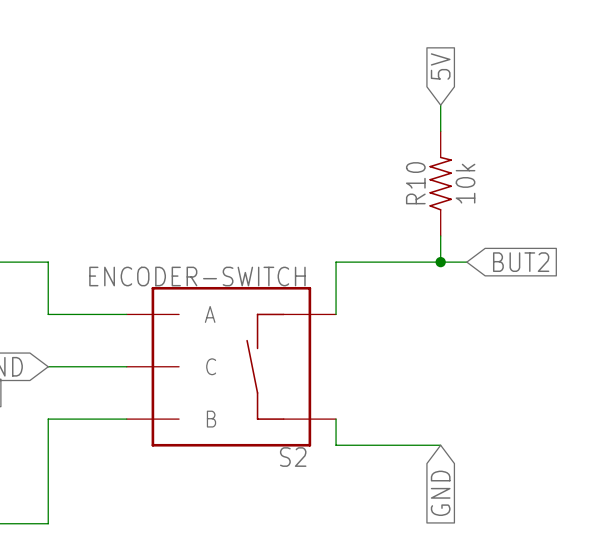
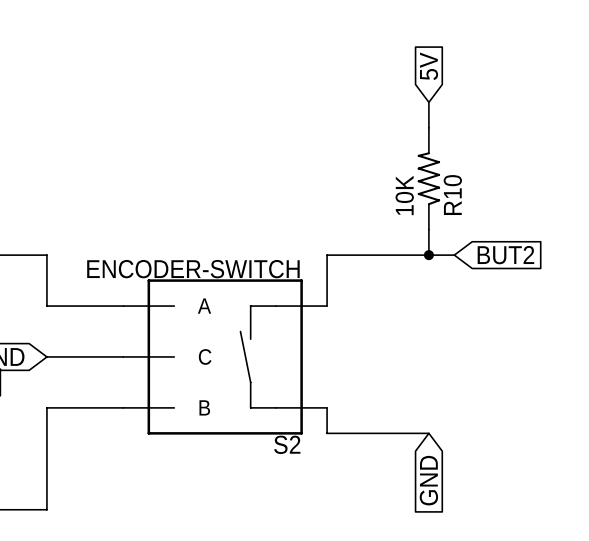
R10 symbol: [429, 131, 452, 236] -> [417, 127, 441, 230]
R10 name position: R10 (415, 183) -> R10 (452, 195)
R10 value: 10k (465, 183) -> 10K (404, 195)

